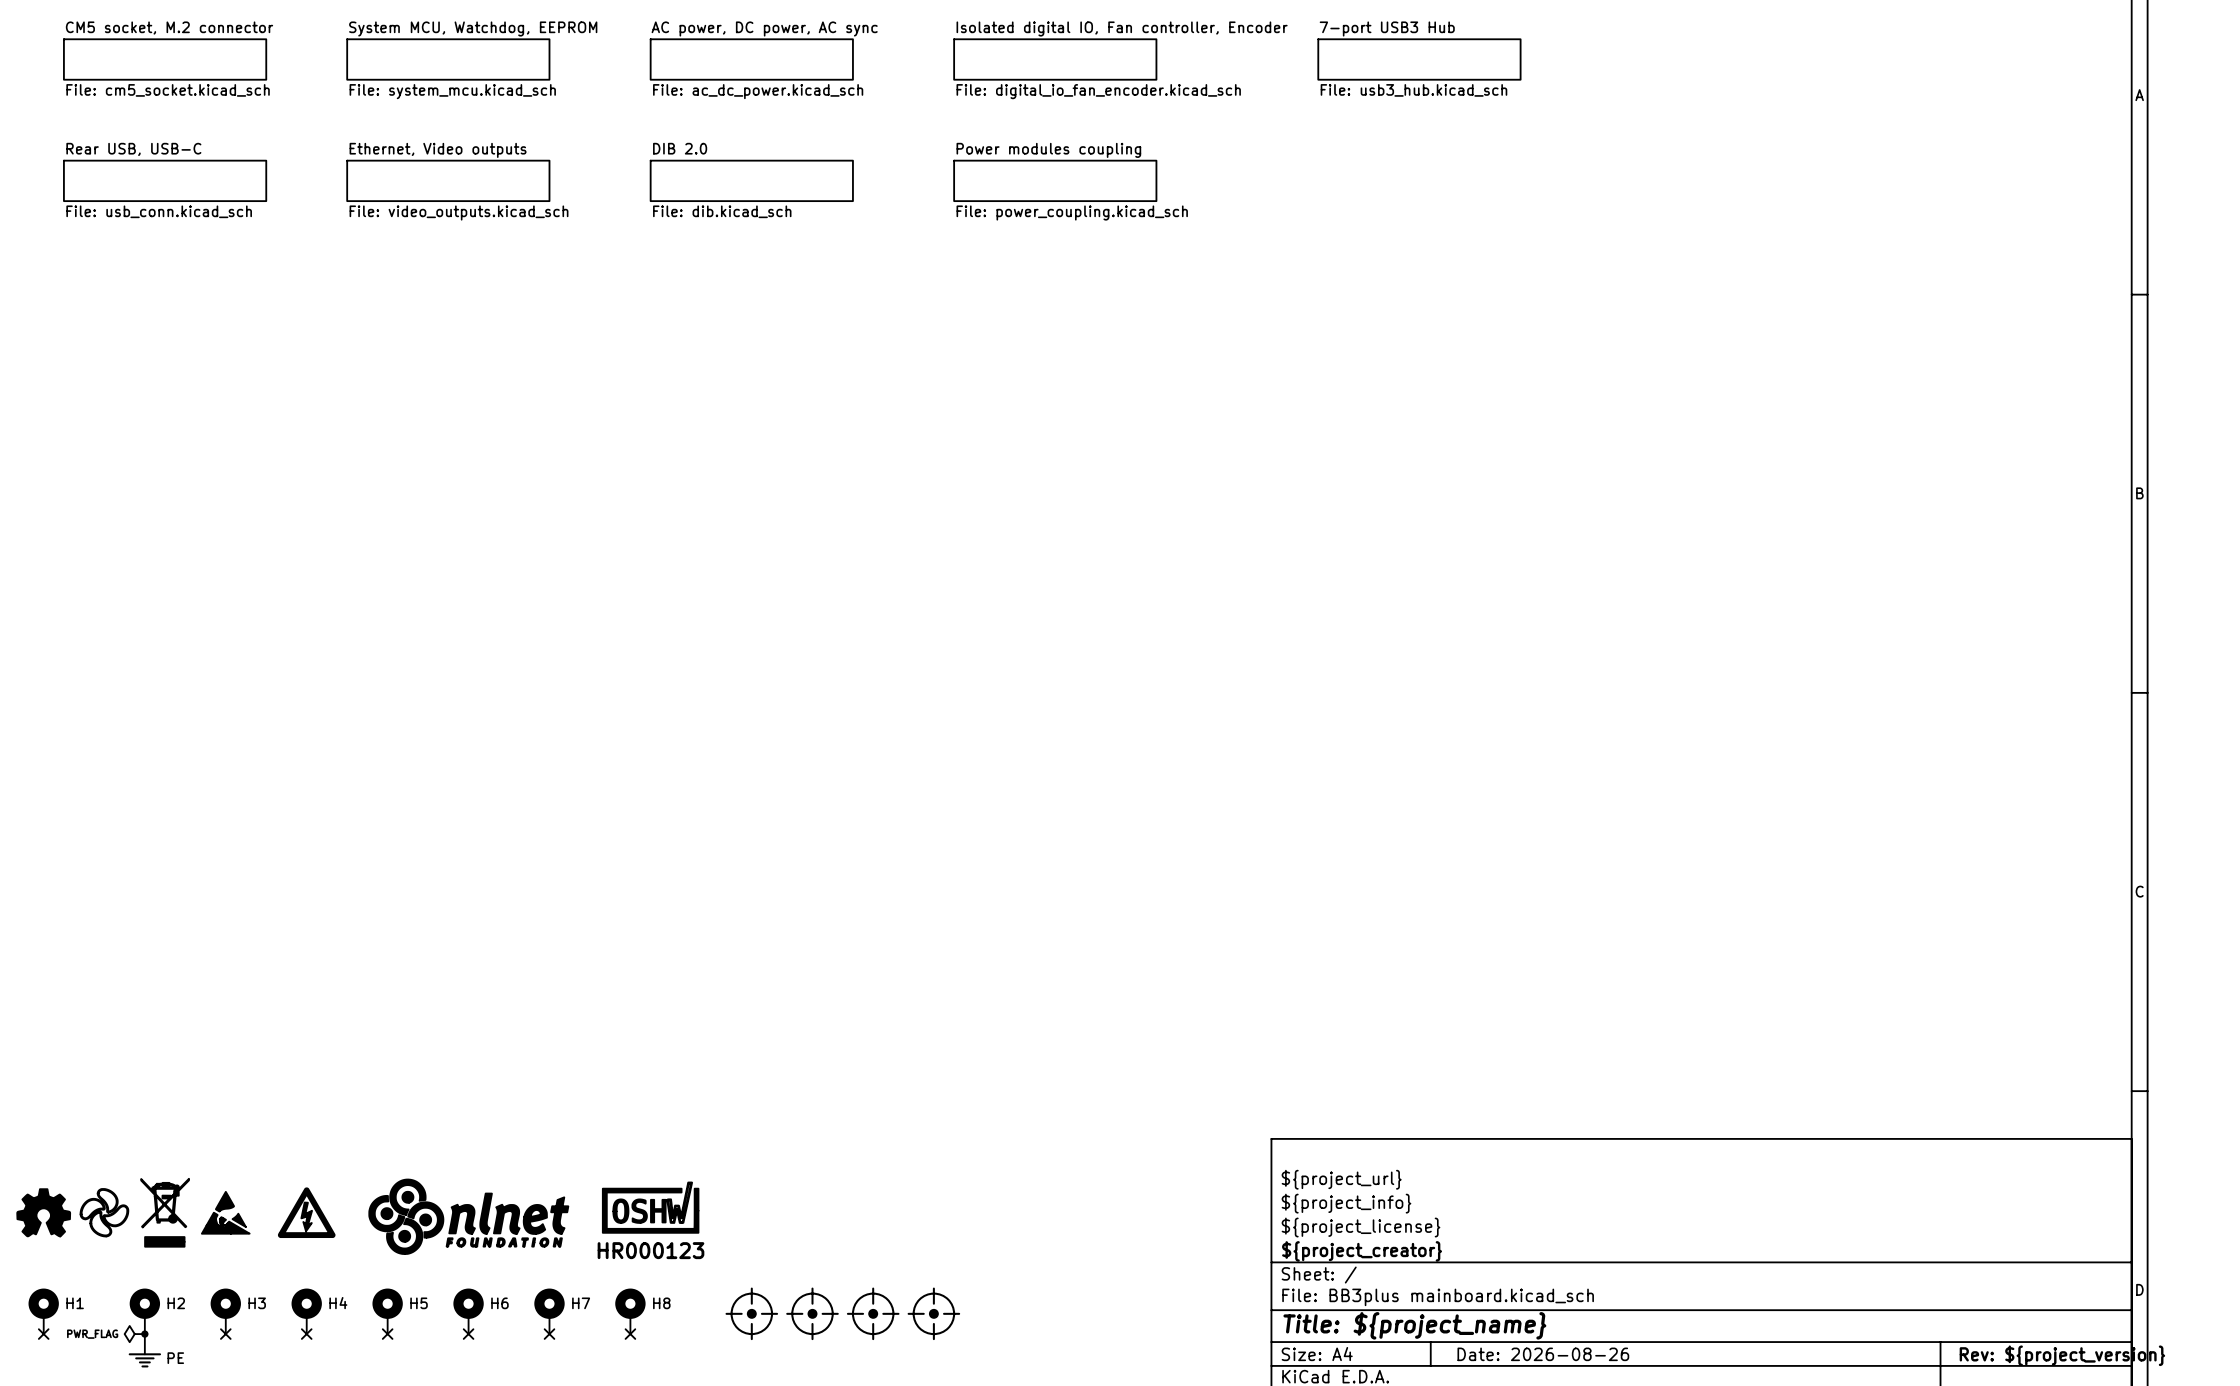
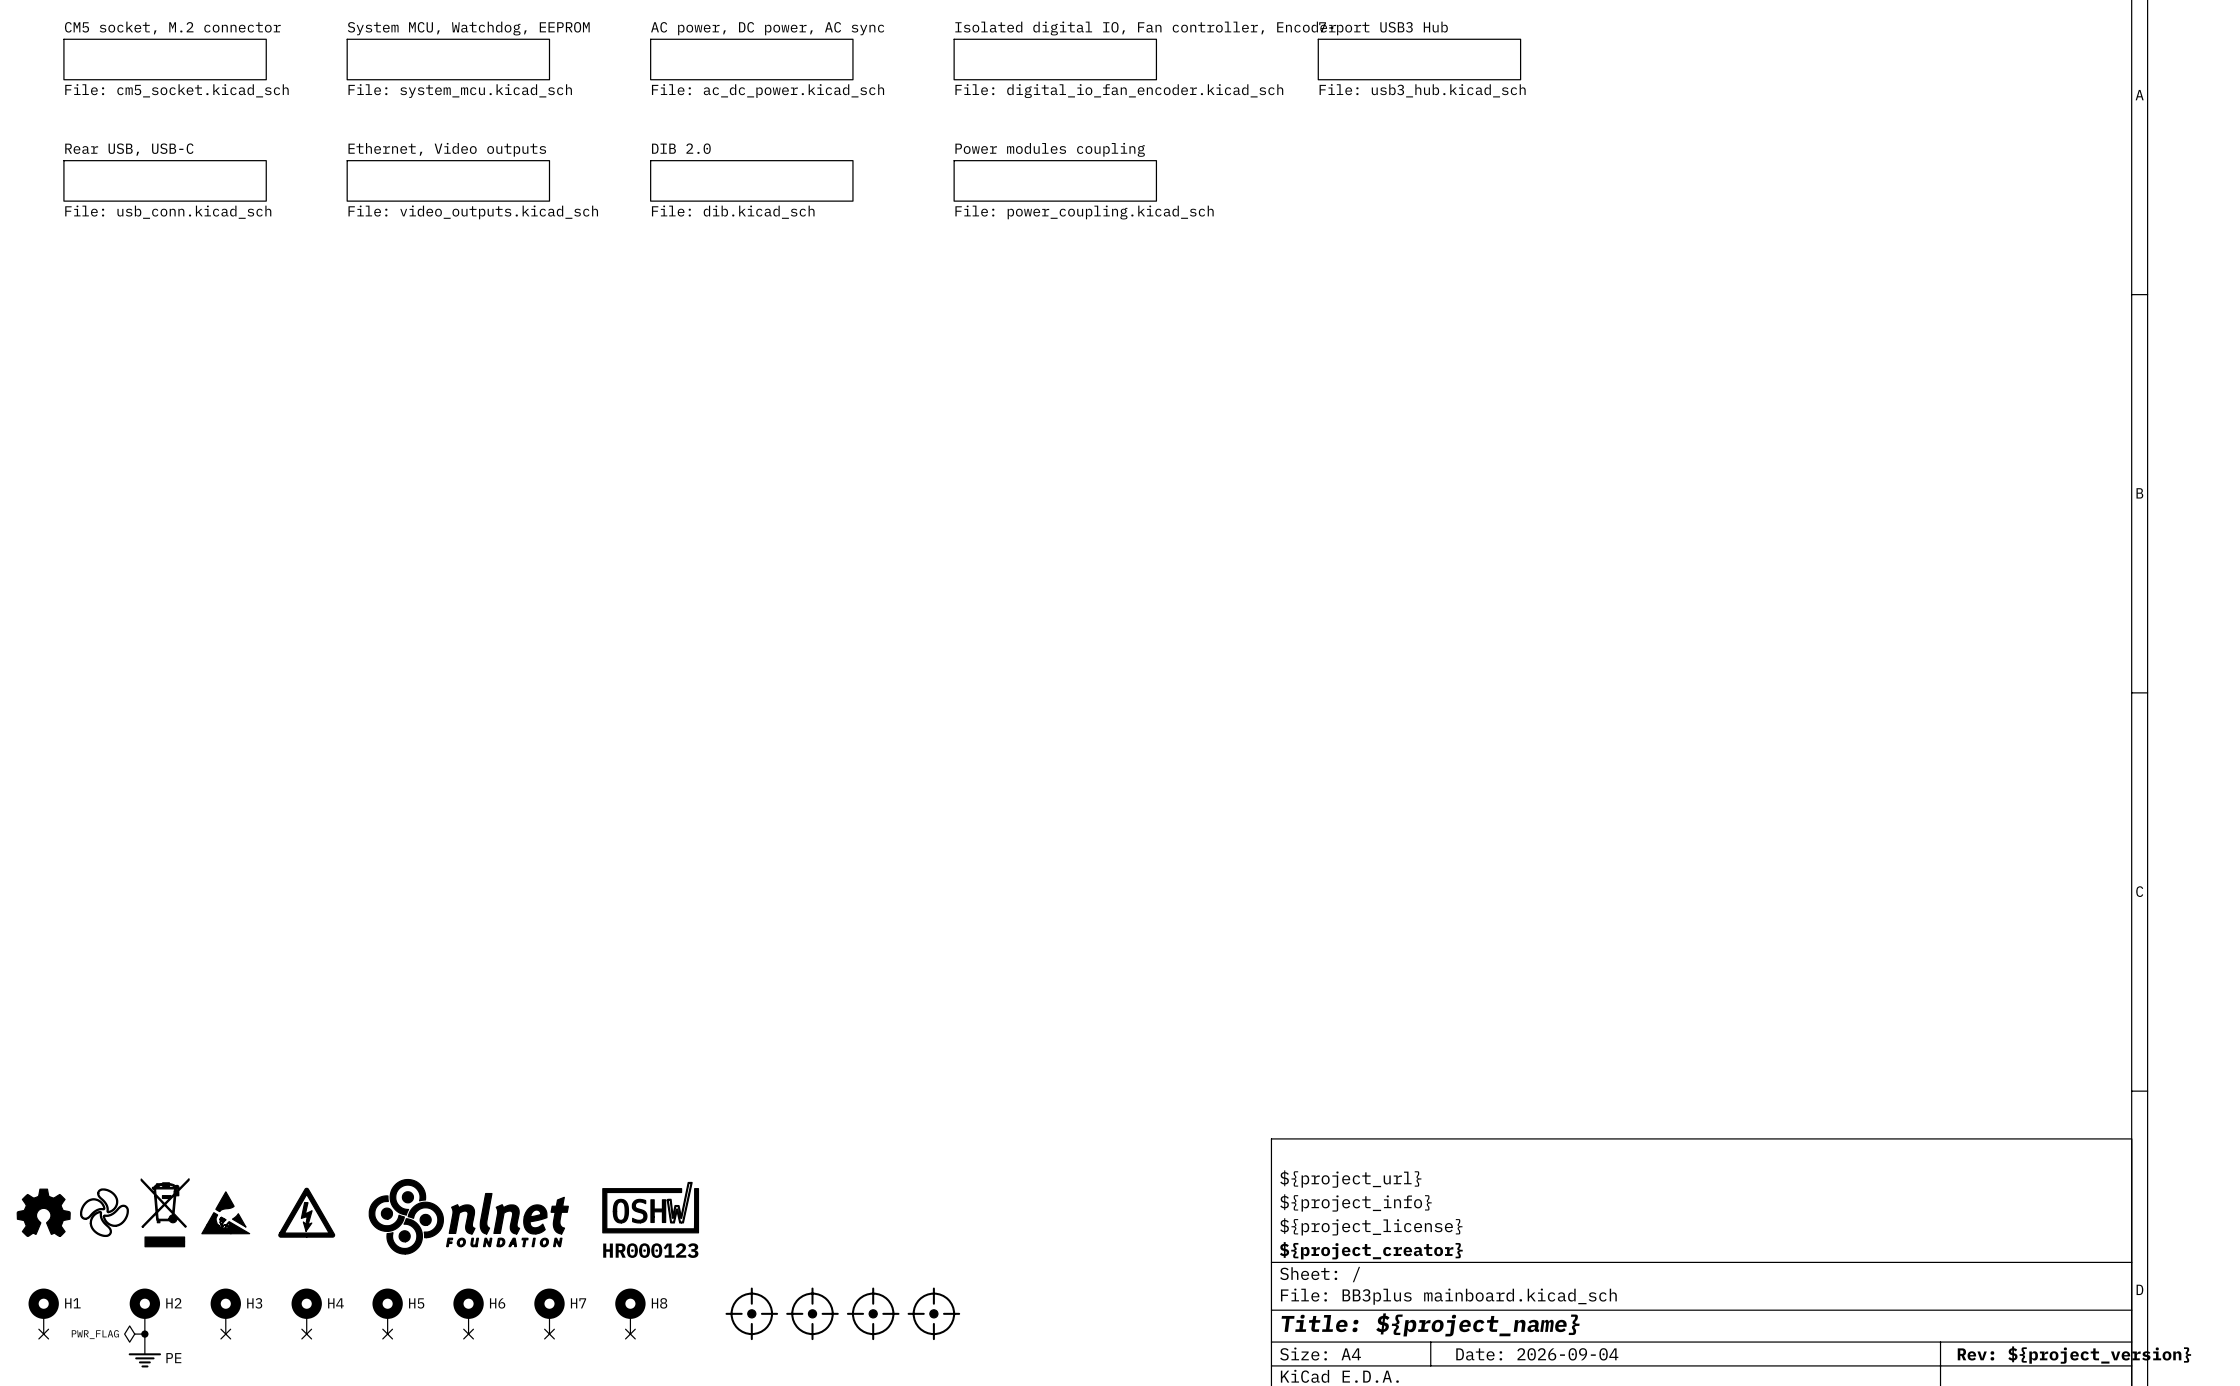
title block: Date: 2026-08-26 (1543, 1354) -> Date: 2026-09-04 (1537, 1354)

